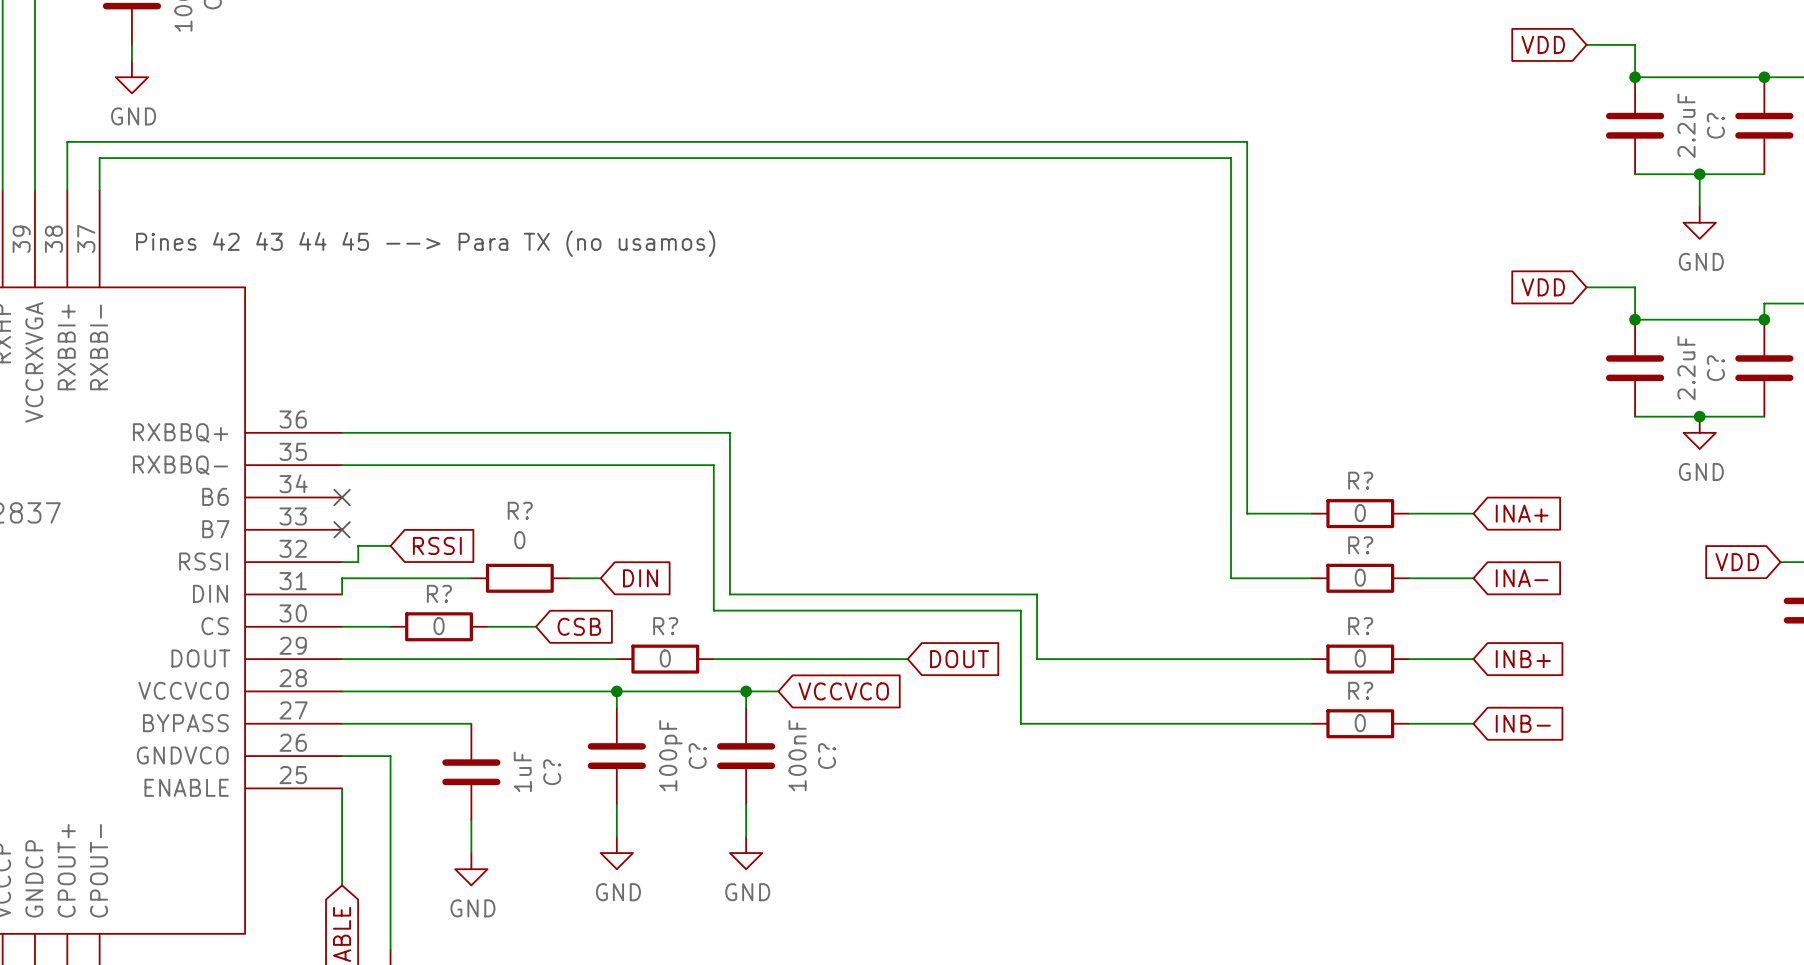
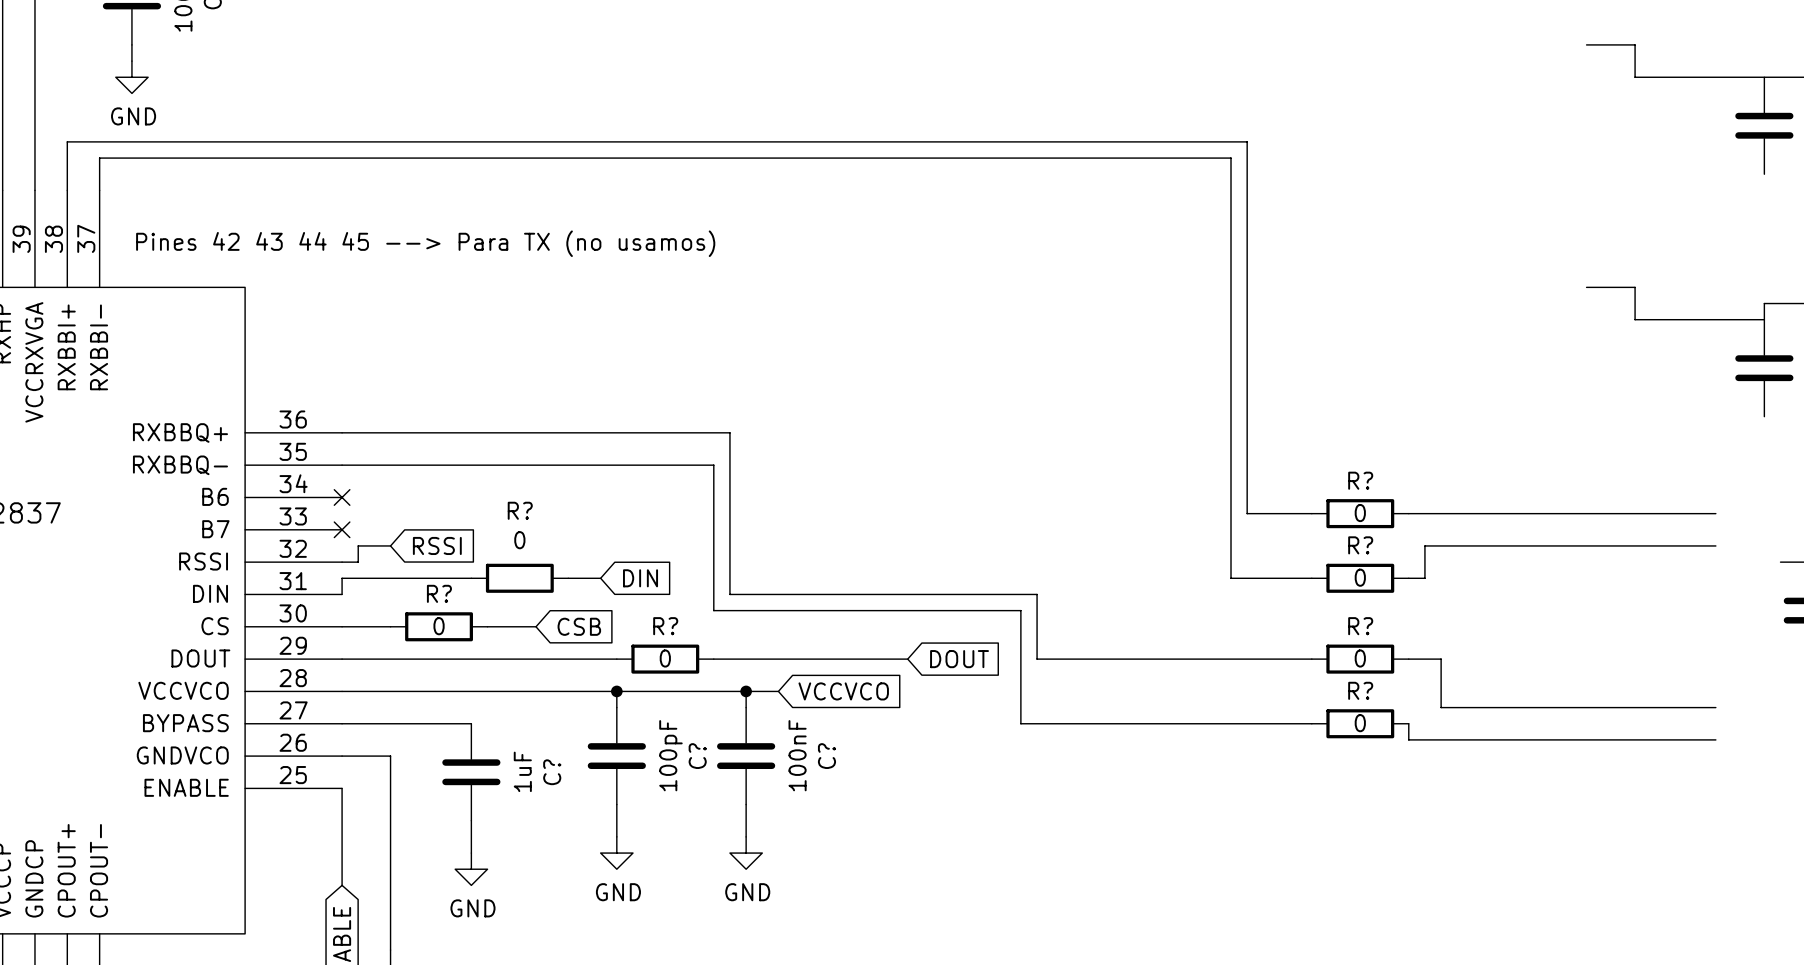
global label: VDD (1543, 44) -> none
junction: (1635, 77) -> none
junction: (1764, 77) -> none
C?: 2.2uF (1635, 125) -> none
wire: (1635, 174) (1764, 174) -> none
wire: (1699, 174) (1699, 206) -> none
junction: (1699, 174) -> none
power symbol: GND (1699, 222) -> none
global label: VDD (1543, 287) -> none
junction: (1635, 319) -> none
junction: (1764, 319) -> none
C?: 2.2uF (1635, 368) -> none
wire: (1635, 416) (1764, 416) -> none
junction: (1699, 416) -> none
power symbol: GND (1699, 432) -> none
wire: none -> (1473, 513) (1715, 513)
global label: INA+ (1522, 513) -> none
global label: VDD (1737, 562) -> none
wire: (1424, 578) (1473, 578) -> (1424, 578) (1424, 545) (1715, 545)
global label: INA- (1522, 578) -> none
wire: (1441, 659) (1473, 659) -> (1441, 659) (1441, 707) (1715, 707)
global label: INB+ (1523, 659) -> none
wire: (1408, 723) (1473, 723) -> (1408, 723) (1408, 739) (1715, 739)
global label: INB- (1523, 723) -> none

